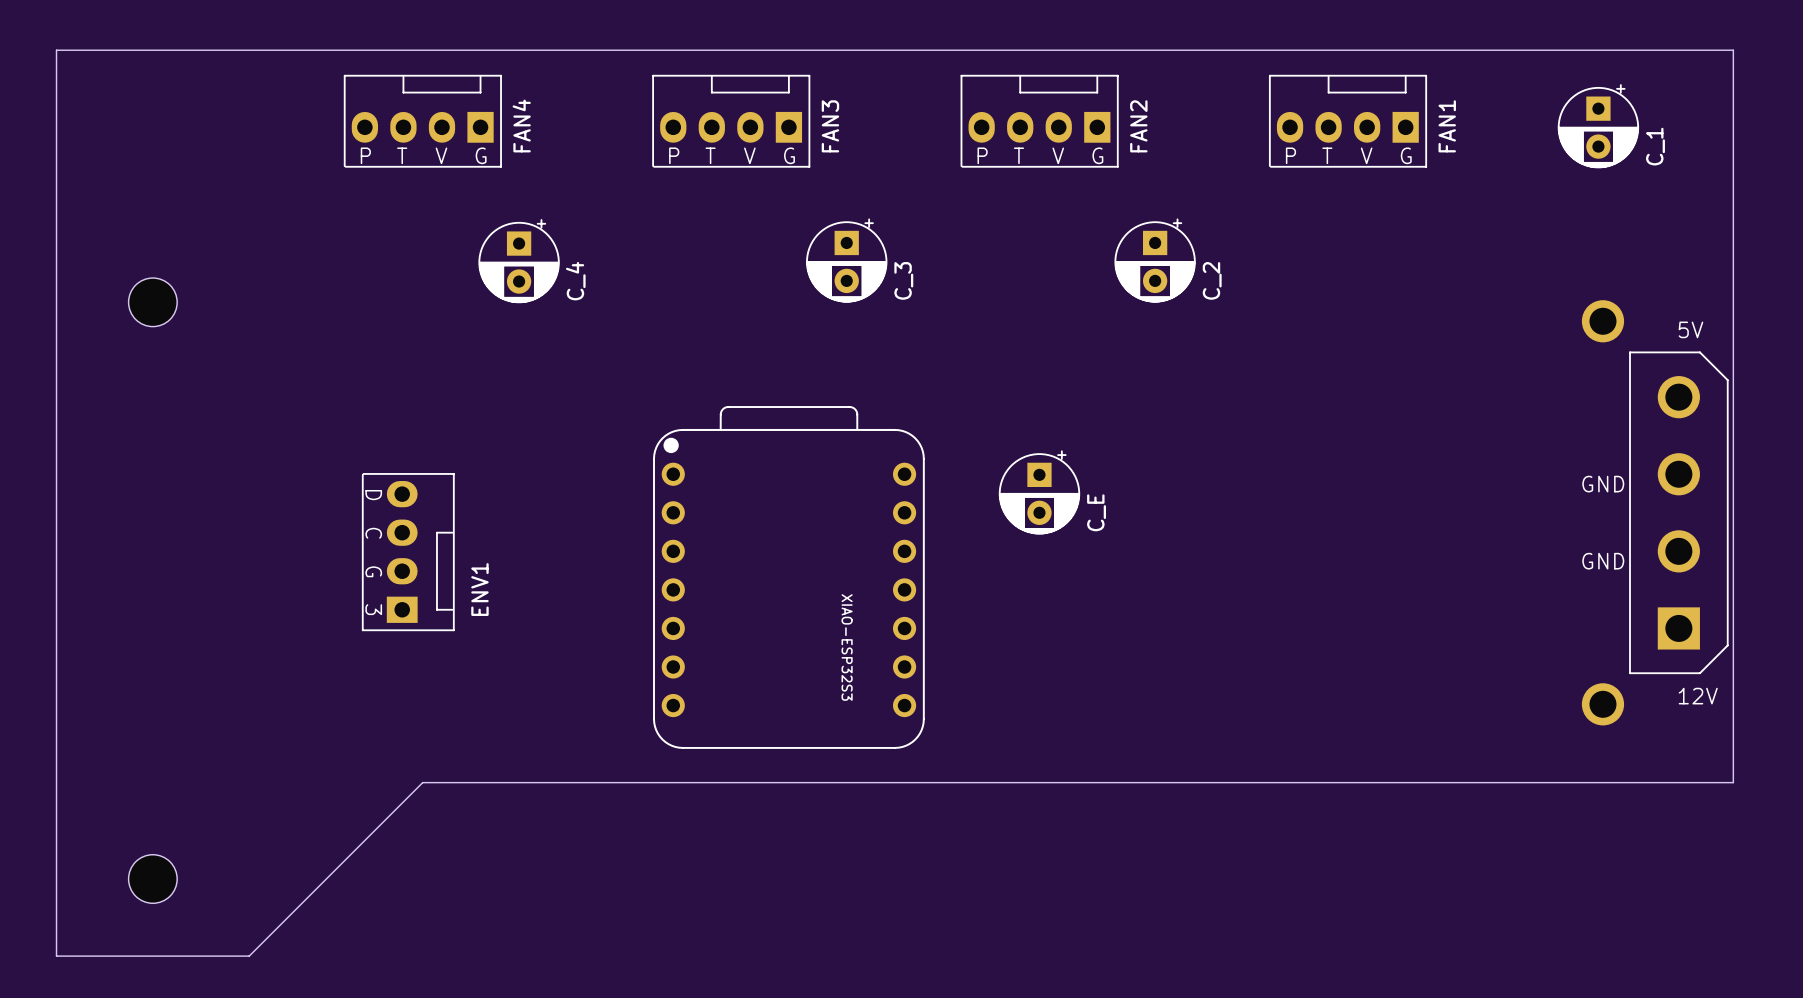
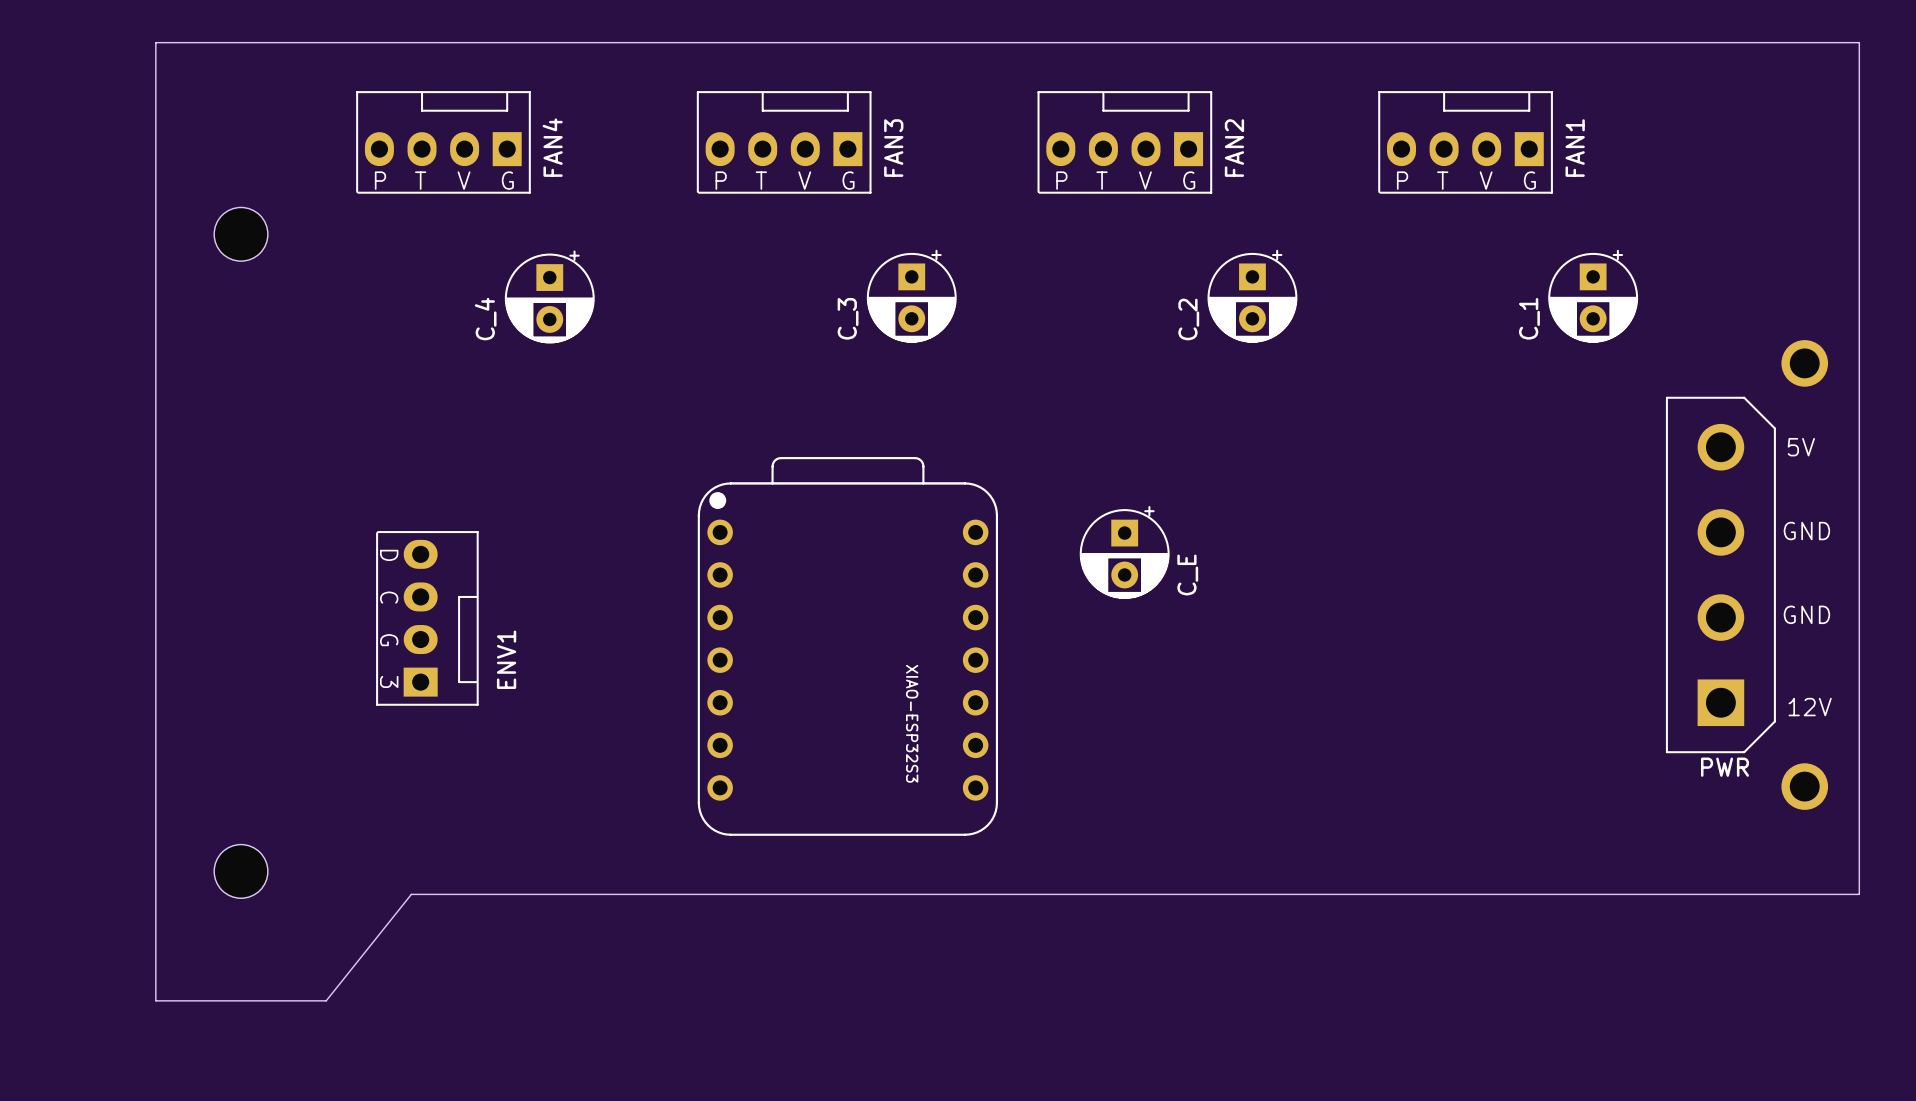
board edge: (56, 50) (56, 956) (249, 956) (422, 782) (1733, 782) (1733, 50) (56, 50) -> (155, 42) (155, 1000) (326, 1000) (411, 894) (1859, 894) (1859, 42) (155, 42)
C_1 position: (1598, 126) -> (1593, 296)
C_1 name position: C_1 (1655, 146) -> C_1 (1529, 318)
C_3 name position: C_3 (903, 280) -> C_3 (848, 318)
C_2 name position: C_2 (1212, 280) -> C_2 (1188, 319)
C_4 name position: C_4 (575, 281) -> C_4 (485, 319)
part position: (152, 302) -> (241, 234)
PWR: none -> (1746, 574)
part: (1655, 512) -> none
part position: (152, 879) -> (241, 871)

